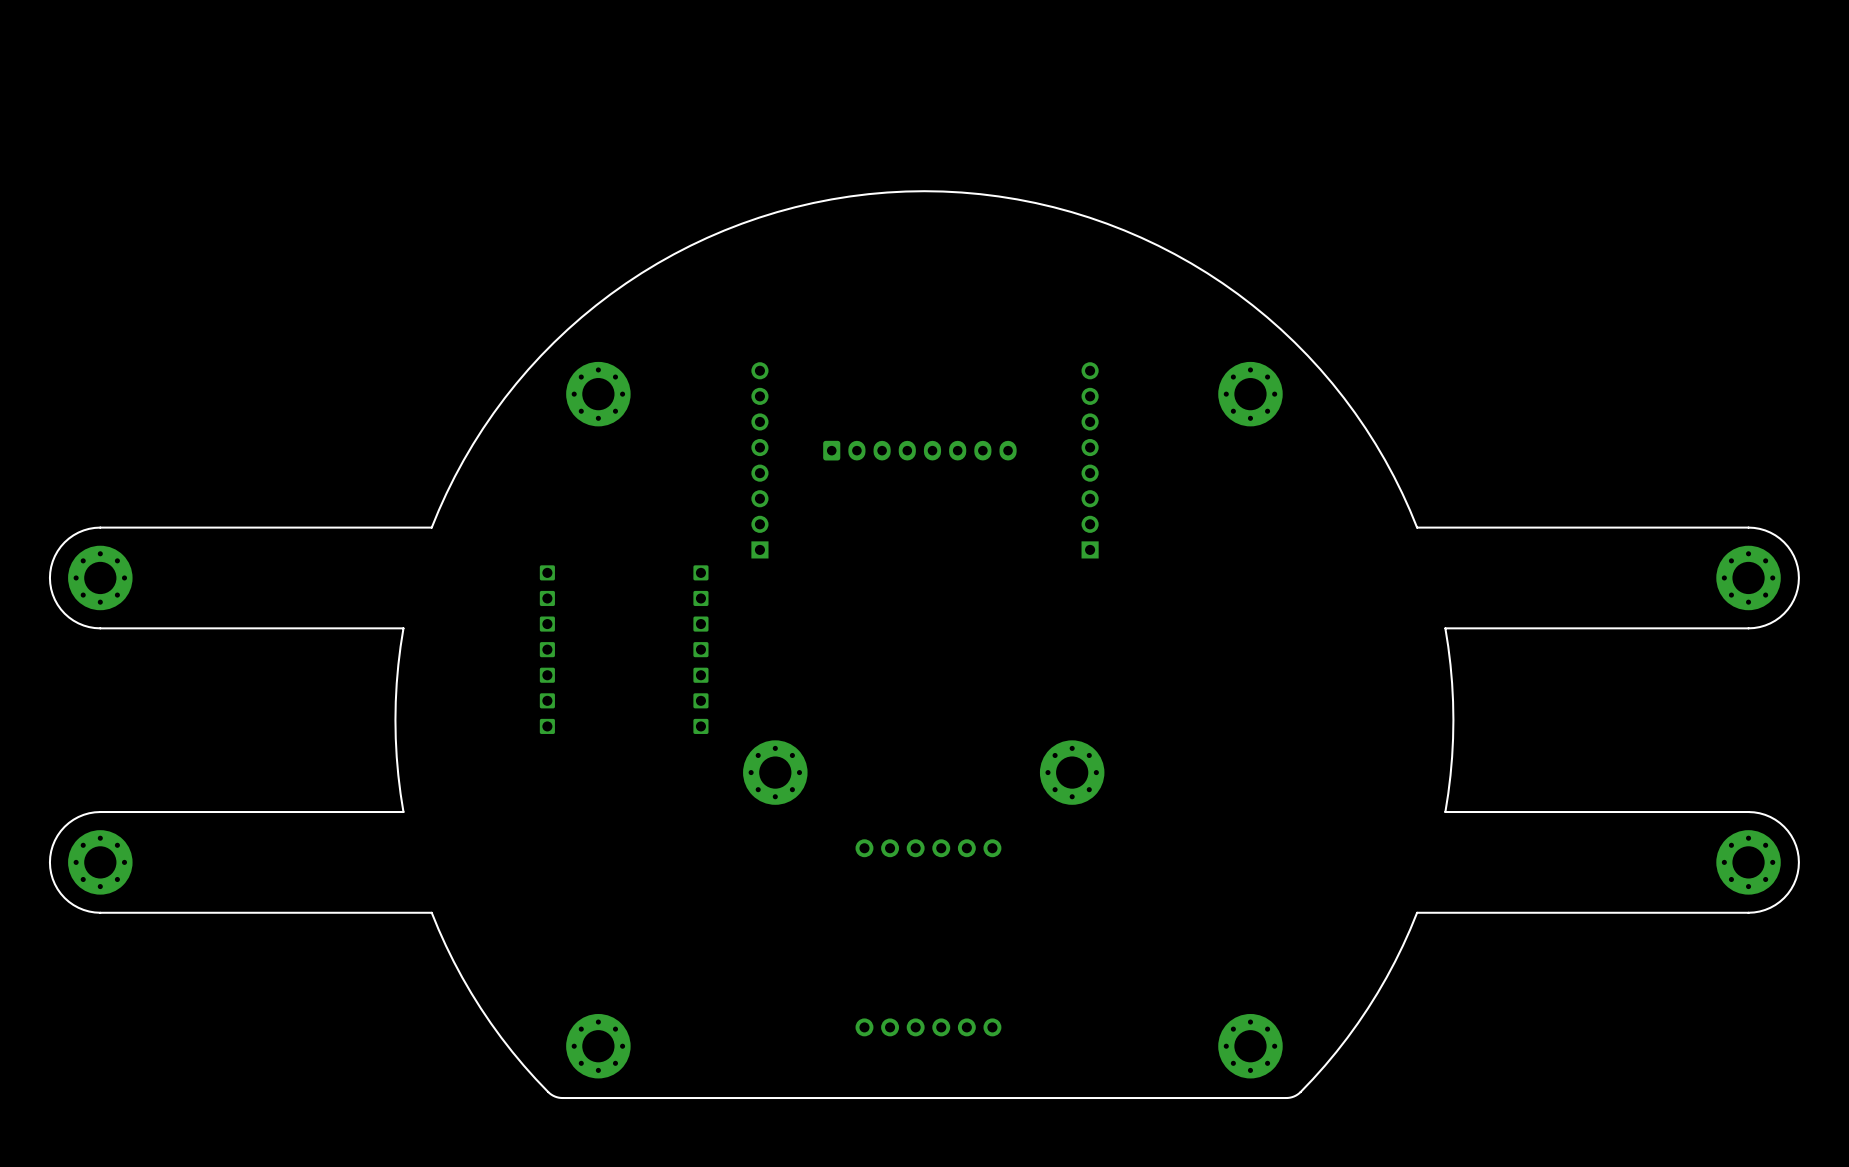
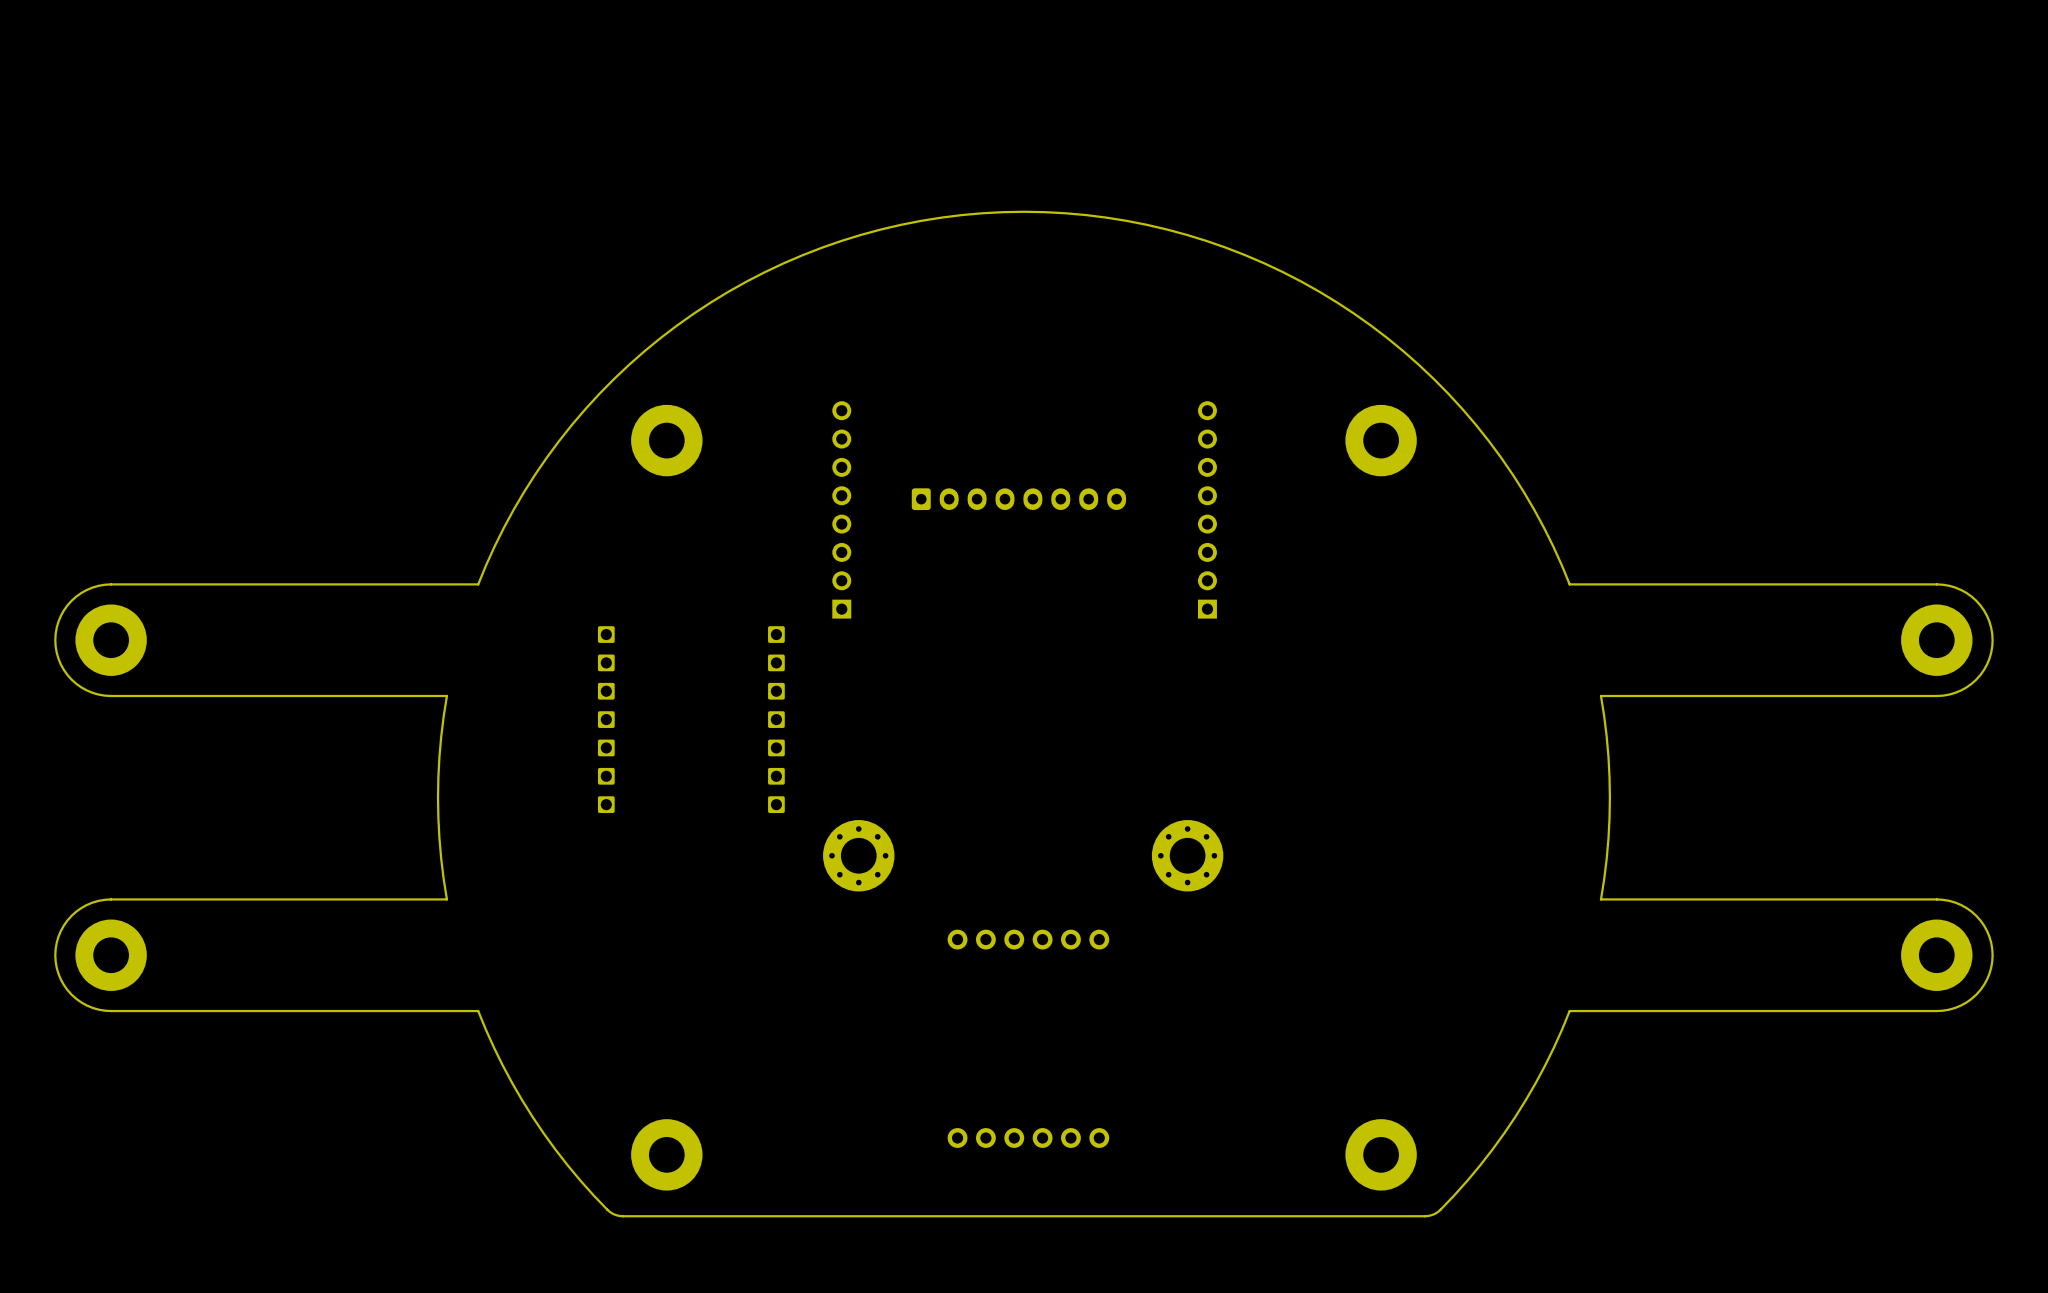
part footprint: [566, 361, 631, 427] -> [631, 404, 703, 477]
part footprint: [1218, 361, 1283, 427] -> [1345, 404, 1417, 477]
part footprint: [68, 545, 133, 611] -> [75, 604, 147, 676]
part footprint: [1716, 545, 1781, 611] -> [1901, 604, 1973, 676]
part footprint: [68, 830, 133, 895] -> [75, 919, 147, 991]
part footprint: [1716, 830, 1781, 895] -> [1901, 919, 1973, 991]
part footprint: [566, 1013, 631, 1079] -> [631, 1119, 703, 1191]
part footprint: [1218, 1013, 1283, 1079] -> [1345, 1119, 1417, 1191]

